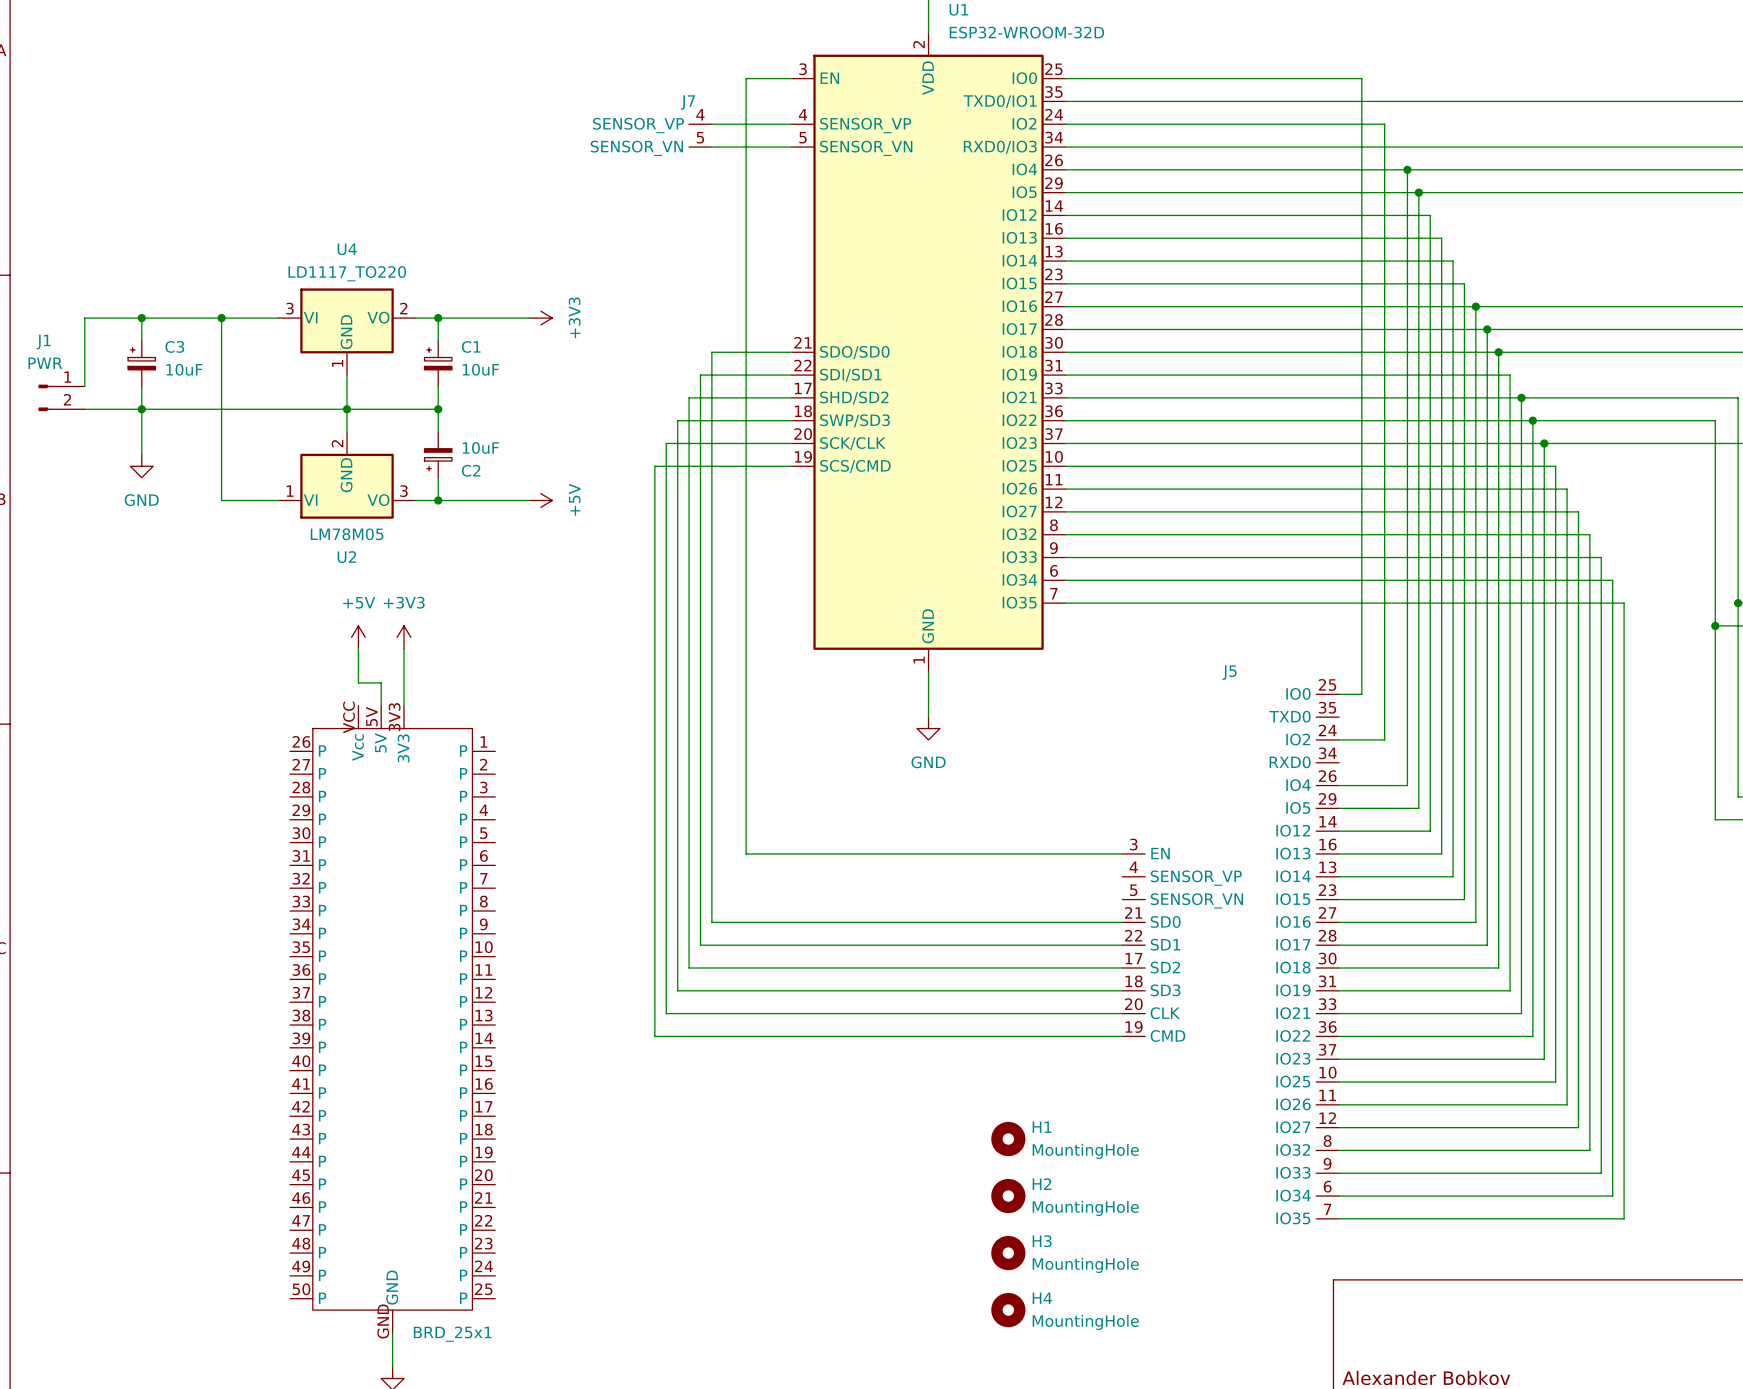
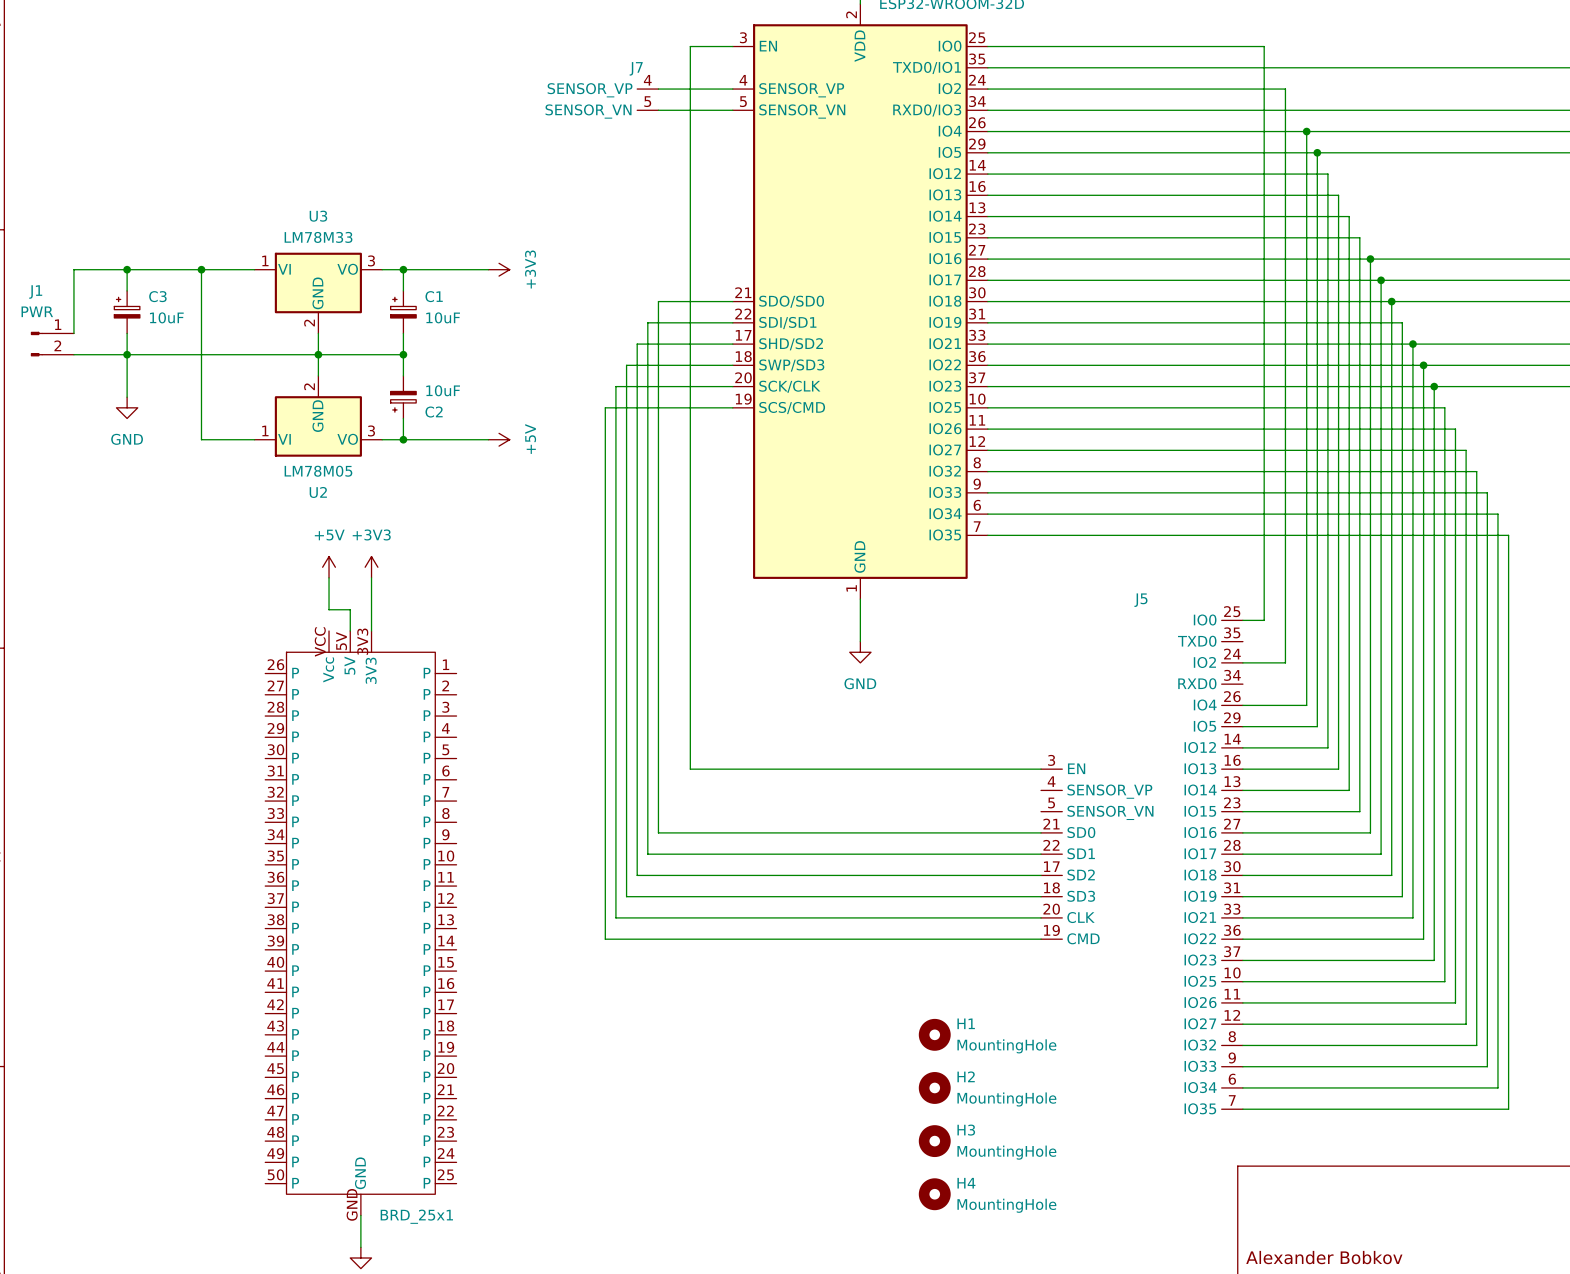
U4: LD1117_TO220 (347, 331) -> none
U3: none -> LM78M33 (318, 293)

